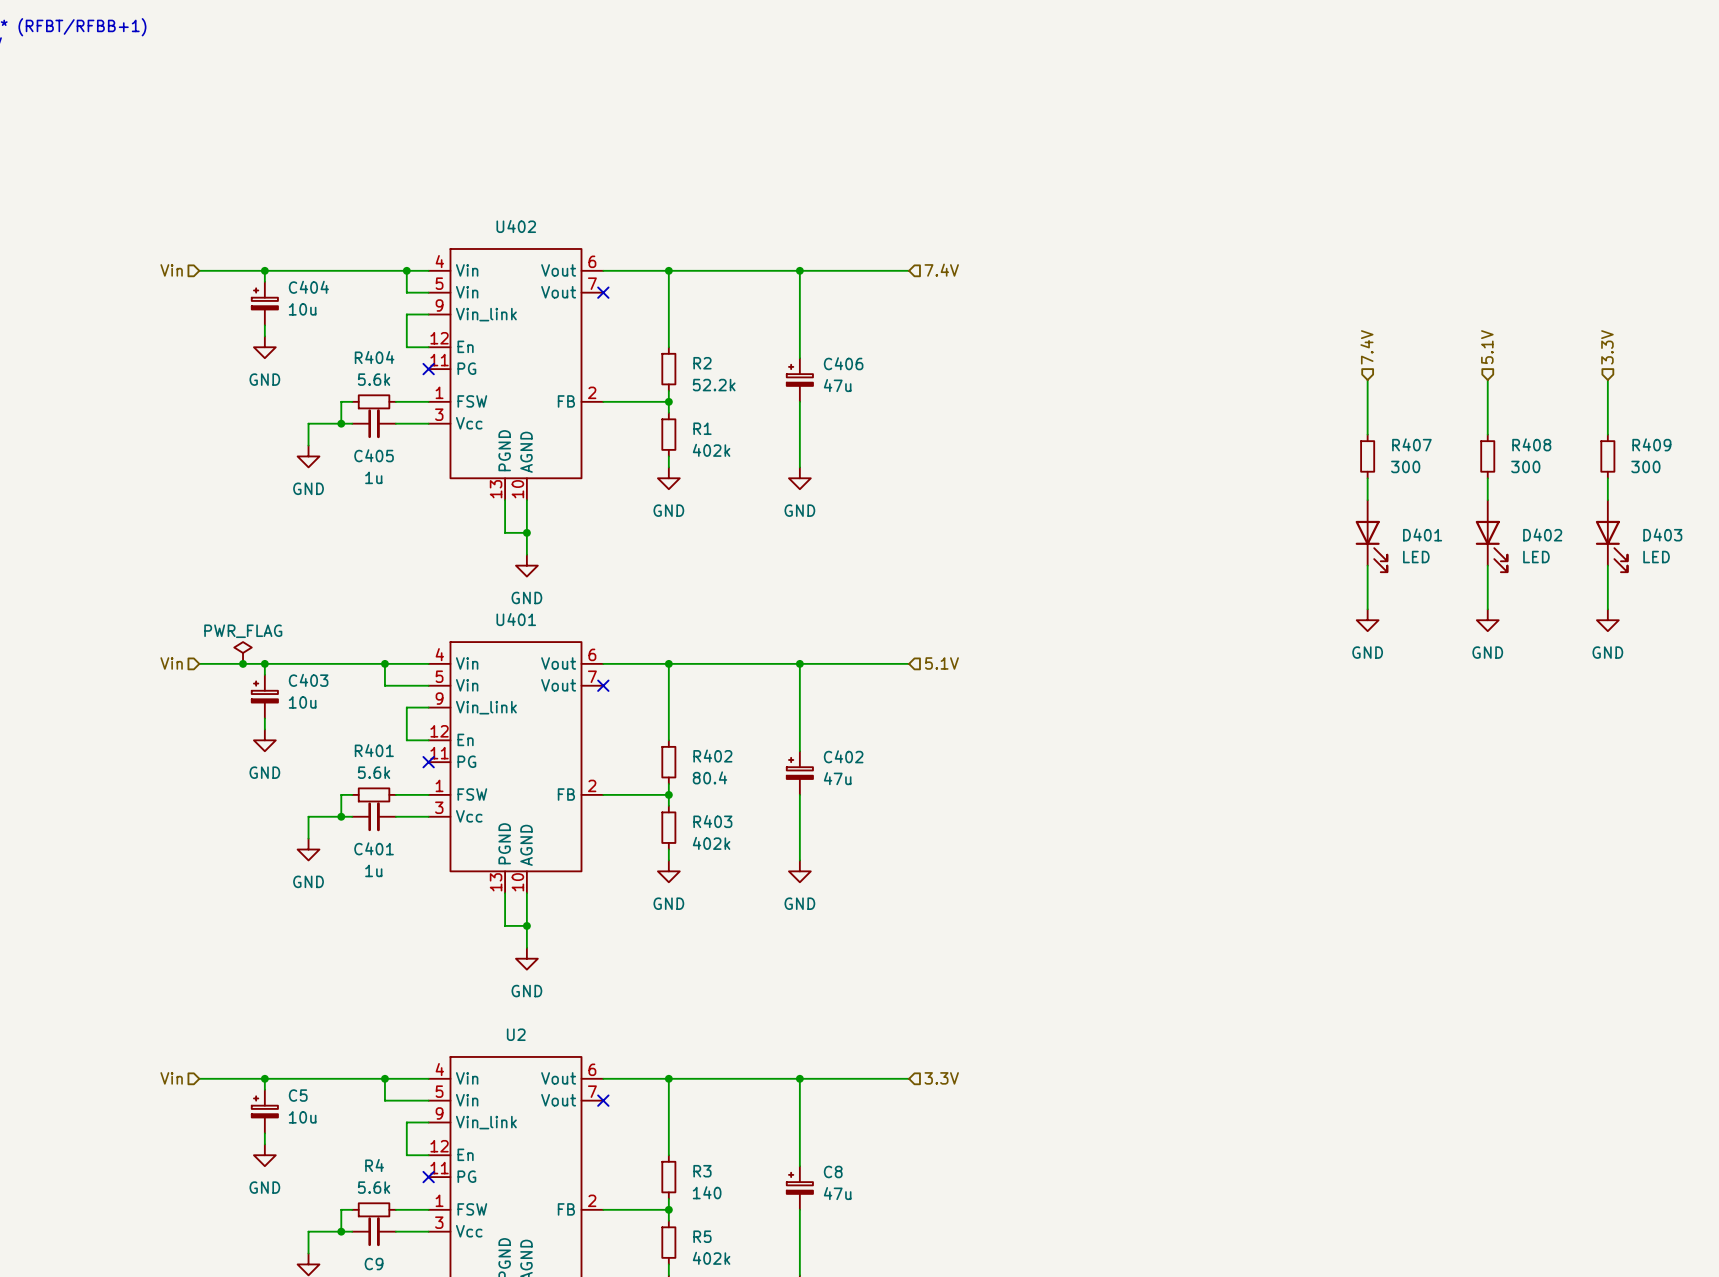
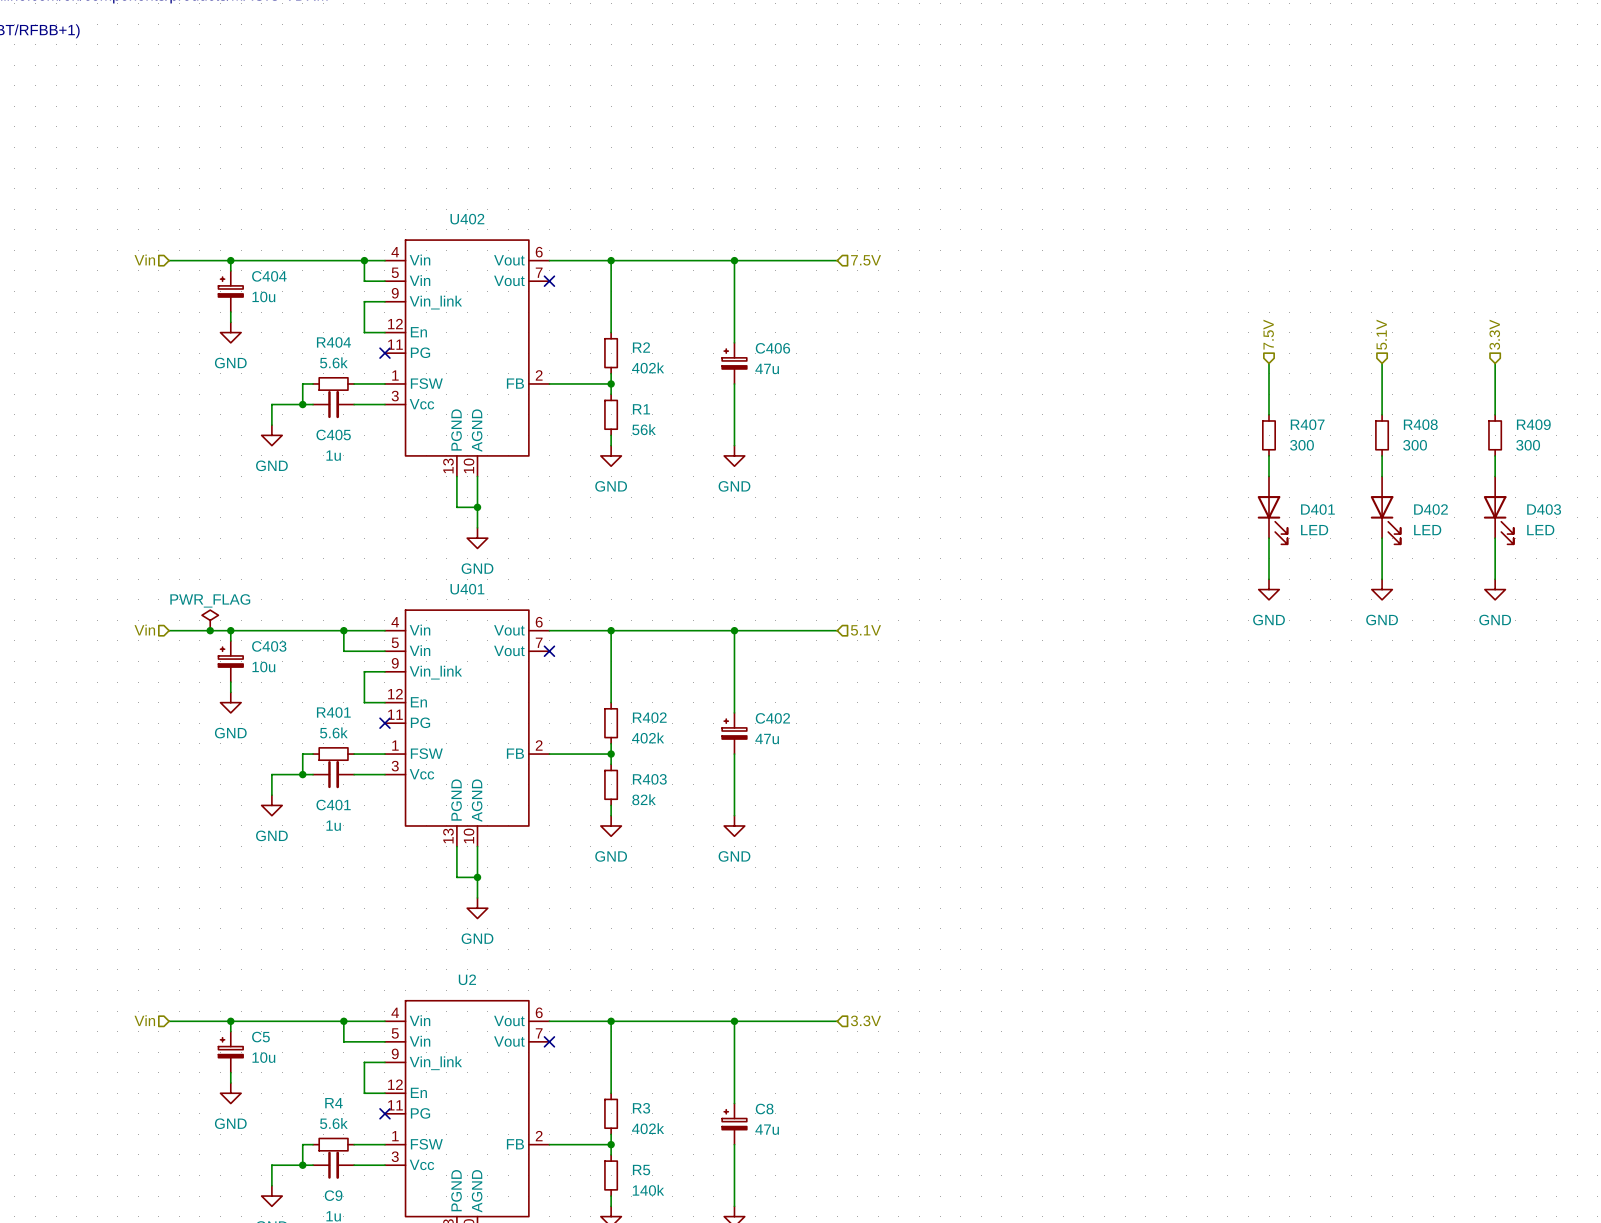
hierarchical label: 7.4V (941, 270) -> 7.5V (866, 260)
hierarchical label: 7.4V (1366, 347) -> 7.5V (1268, 334)
R2 value: 52.2k (714, 385) -> 402k (648, 367)
R1 value: 402k (711, 450) -> 56k (644, 429)
R402 value: 80.4 (710, 777) -> 402k (648, 738)
R403 value: 402k (711, 843) -> 82k (644, 799)
R3 value: 140 (707, 1192) -> 402k (648, 1128)
R5 value: 402k (711, 1258) -> 140k (648, 1190)

